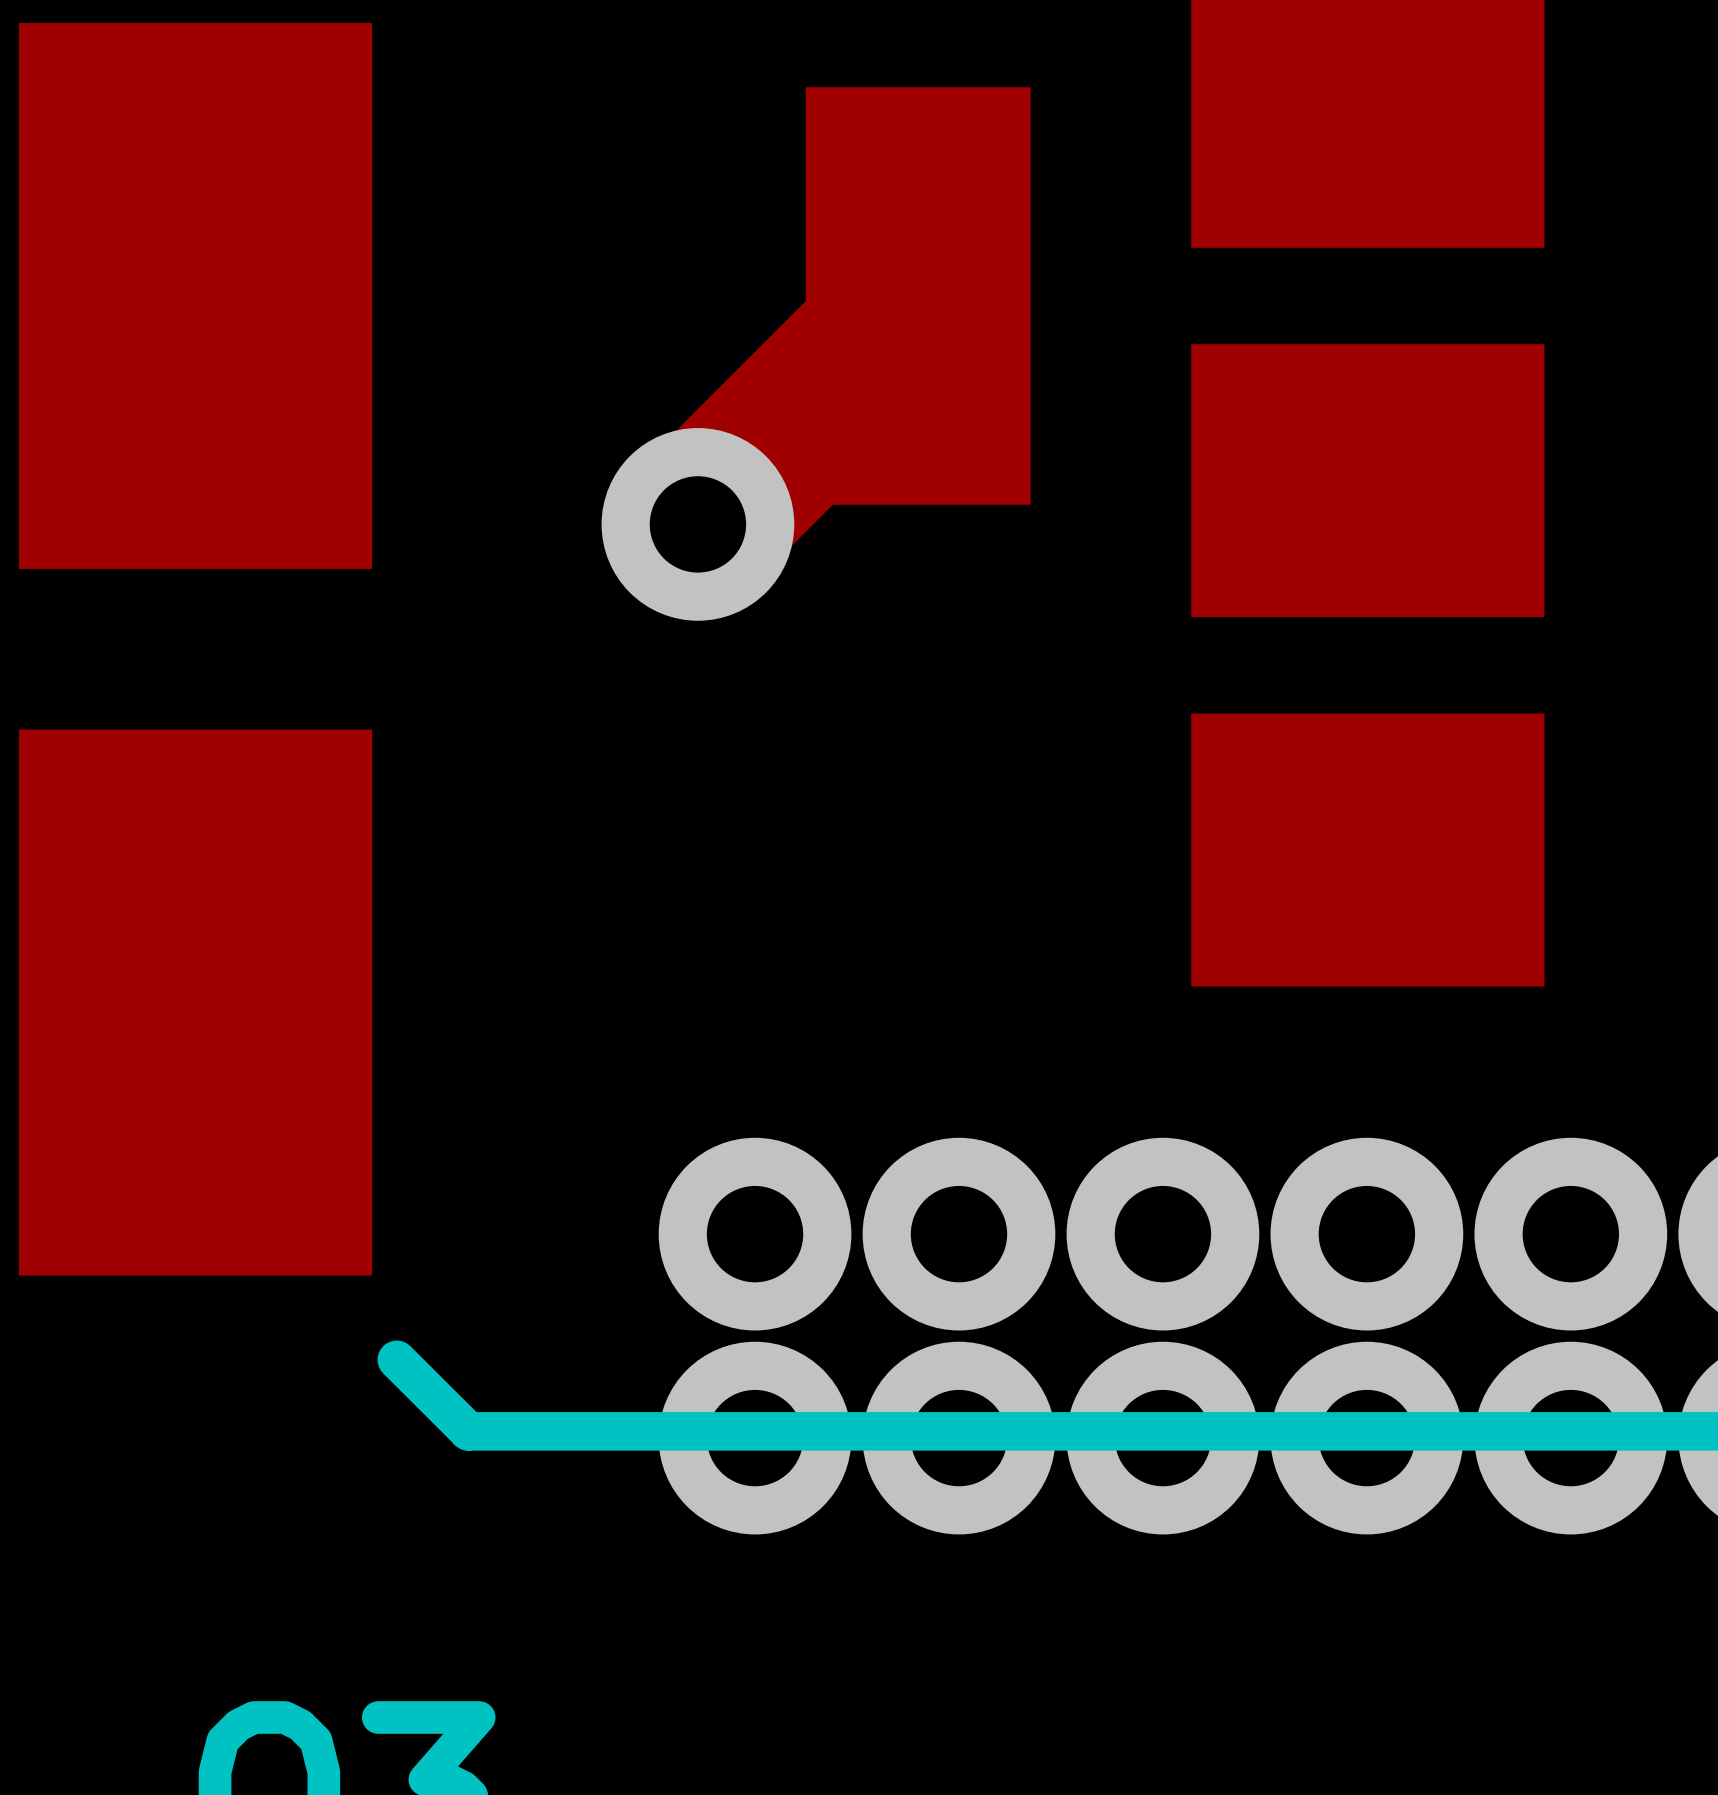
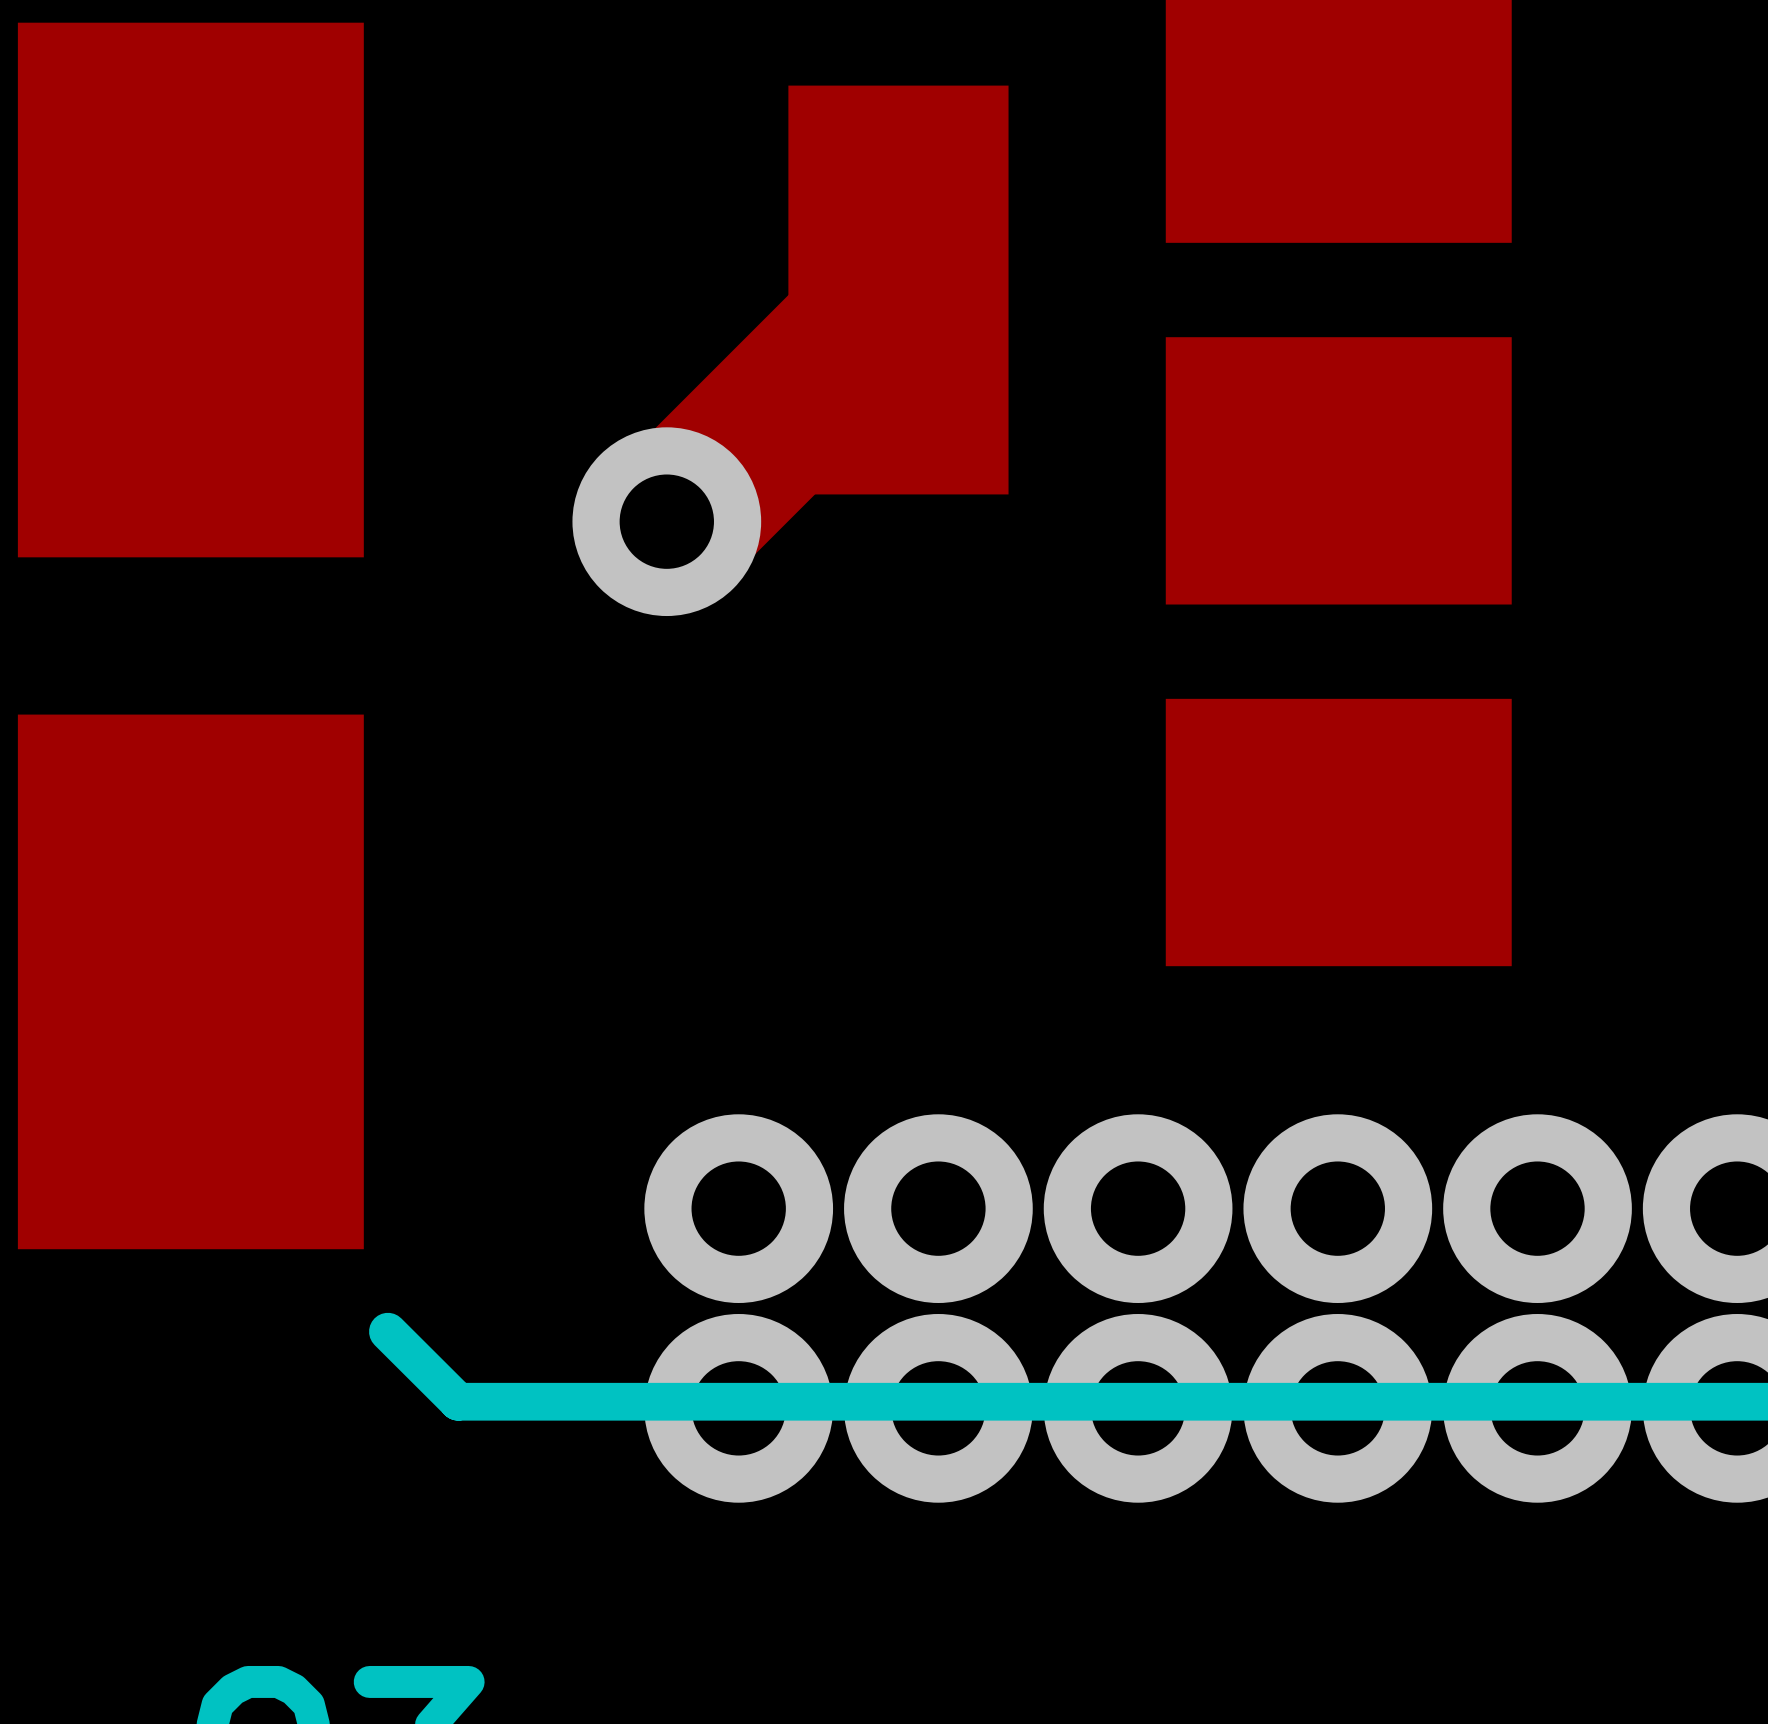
via position: (697, 524) -> (666, 521)

